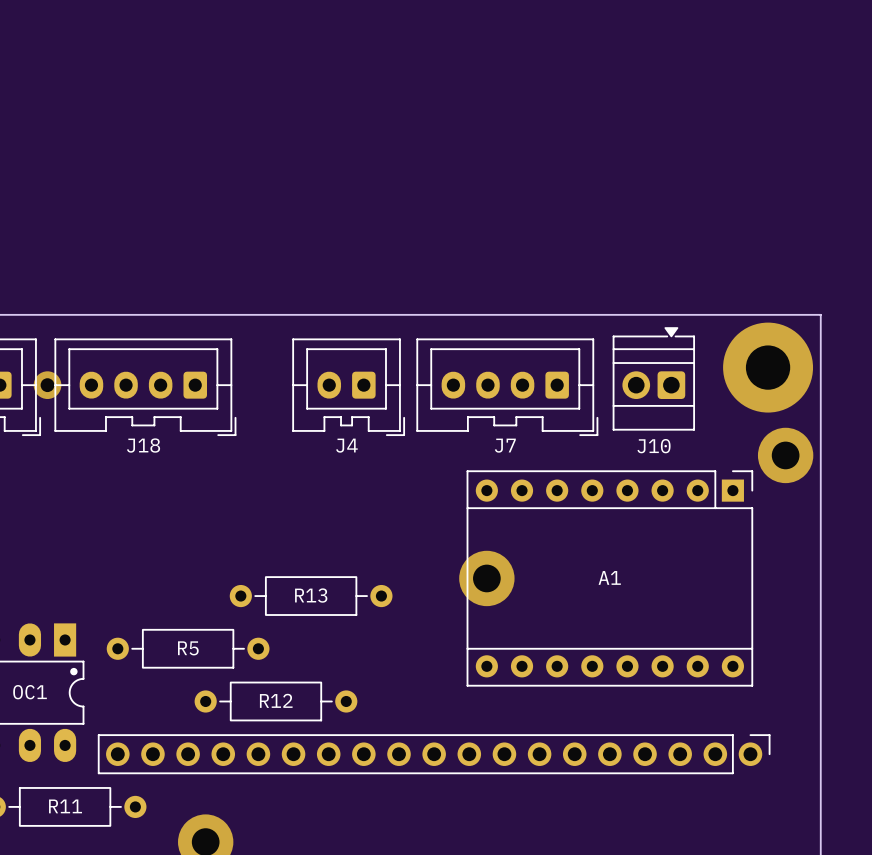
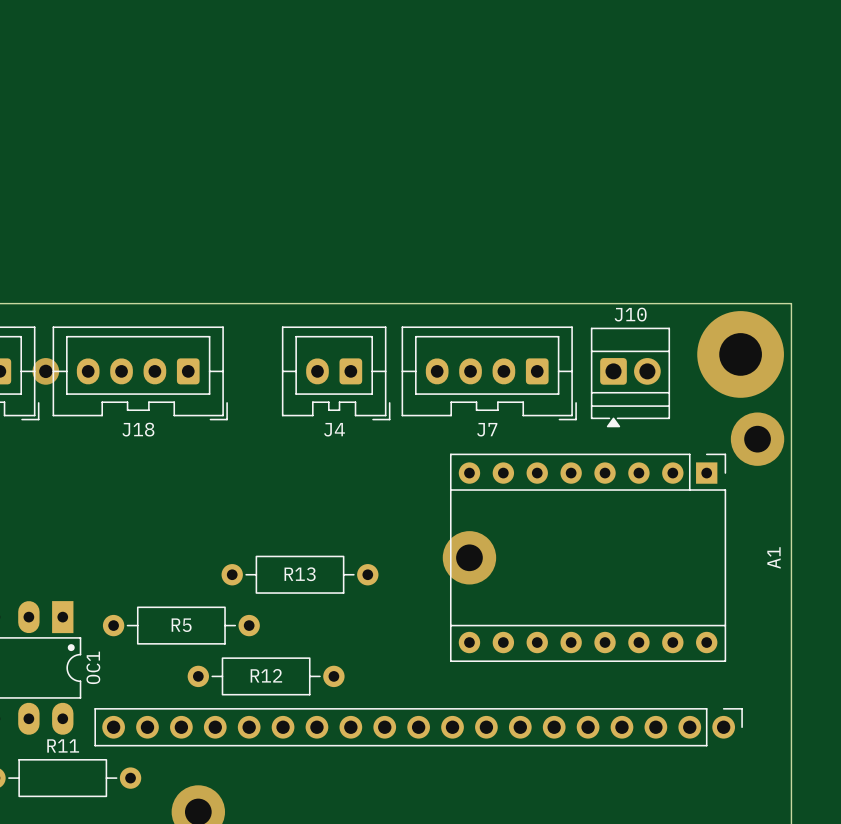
J10 rotation: 0° (653, 378) -> 180° (630, 377)
A1 name rotation: 0° (609, 577) -> 90° counterclockwise (773, 557)
A1 name position: A1 (609, 577) -> A1 (773, 557)
OC1 name rotation: 0° (30, 692) -> 90° counterclockwise (93, 667)
OC1 name position: OC1 (30, 692) -> OC1 (93, 667)
R11 name position: R11 (65, 806) -> R11 (63, 745)

